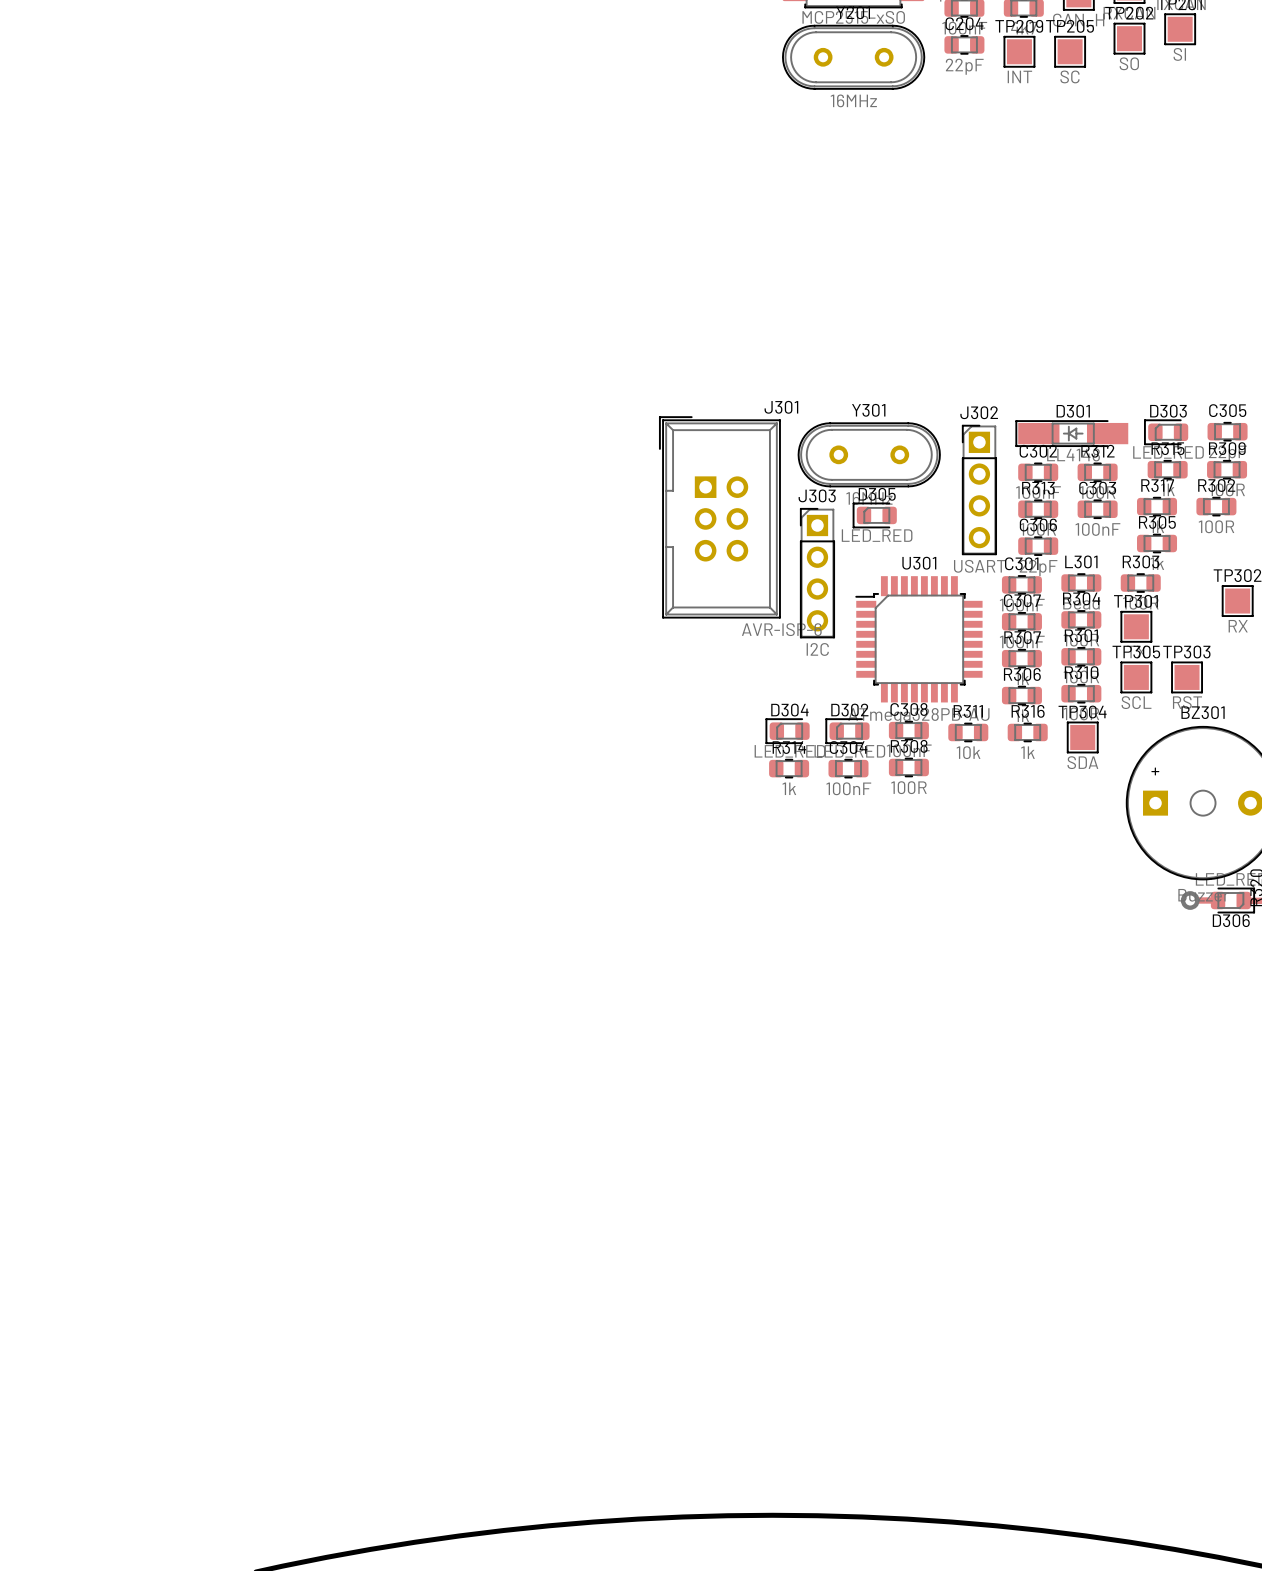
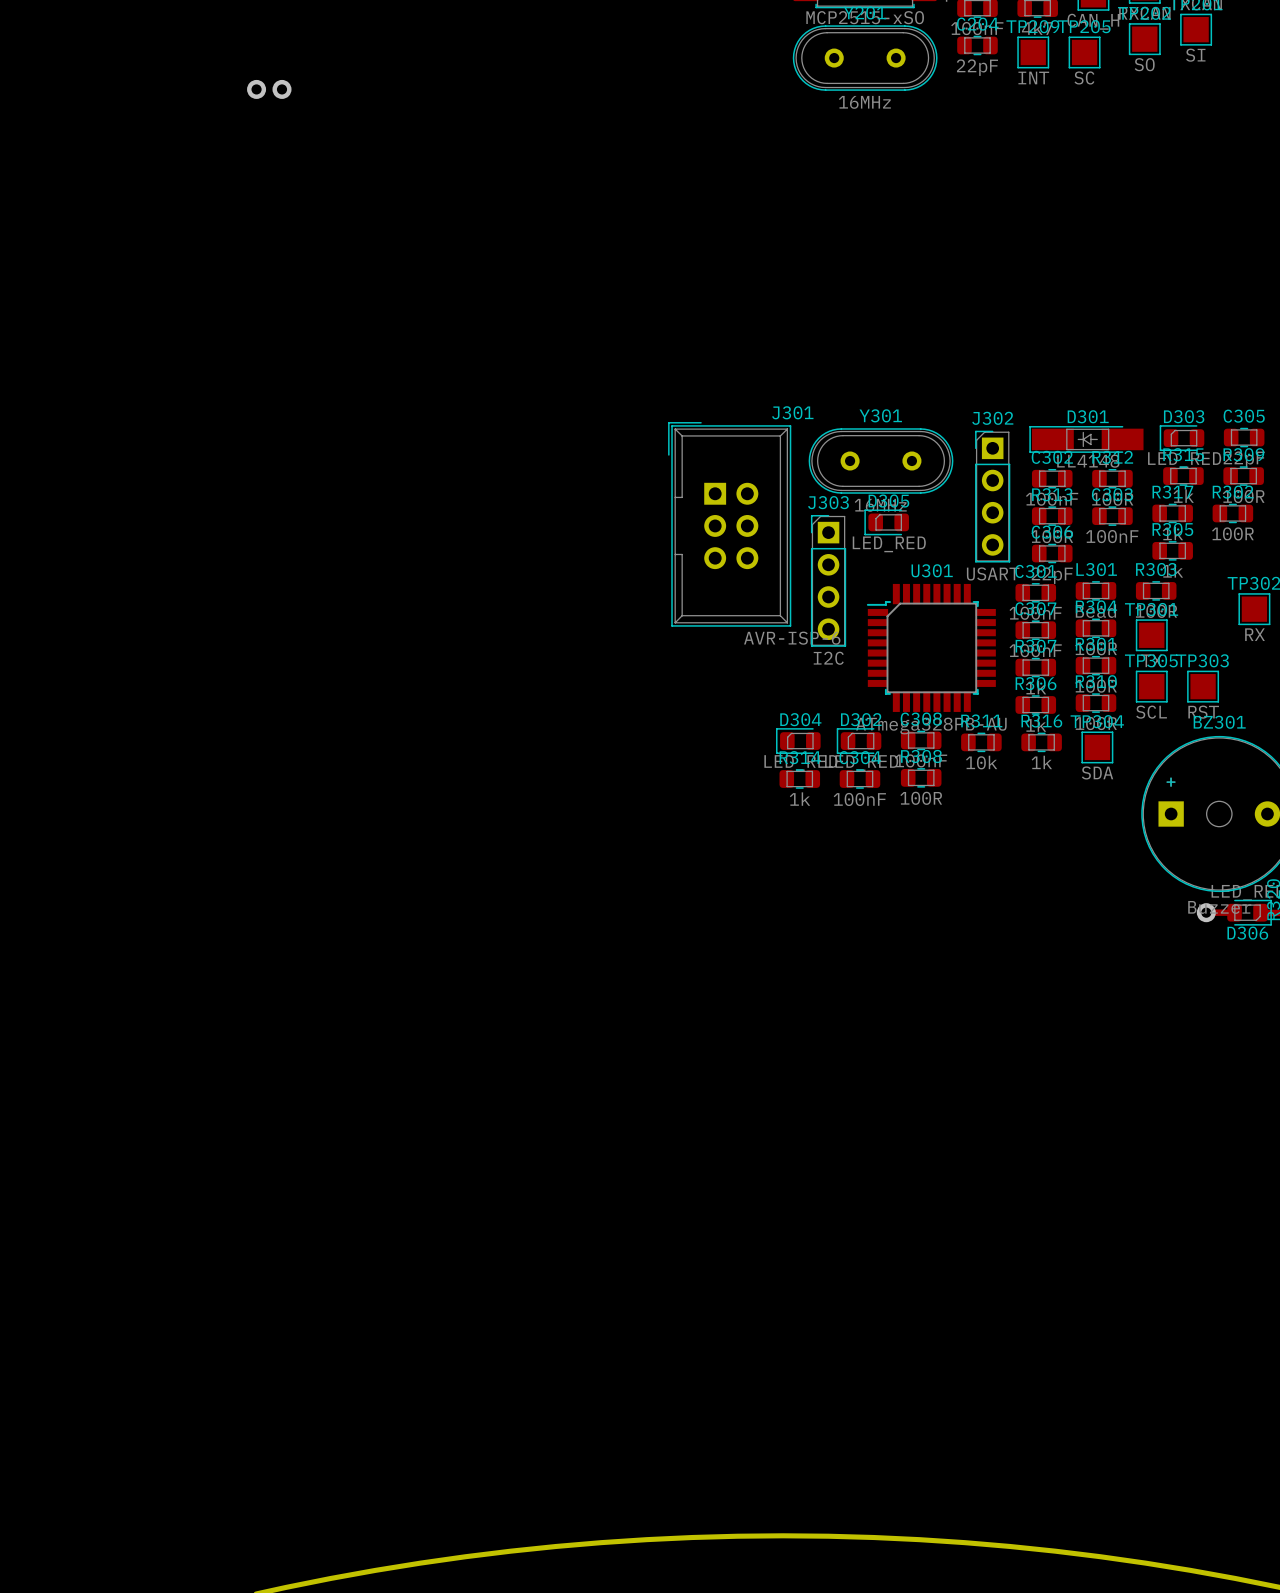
via: none -> (256, 89)
via: none -> (282, 89)

